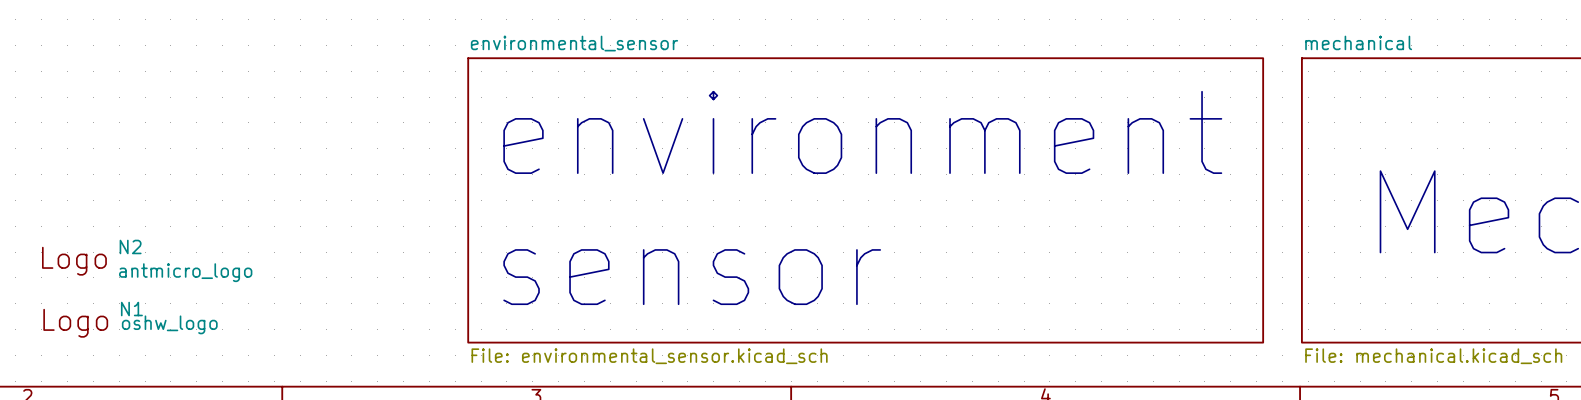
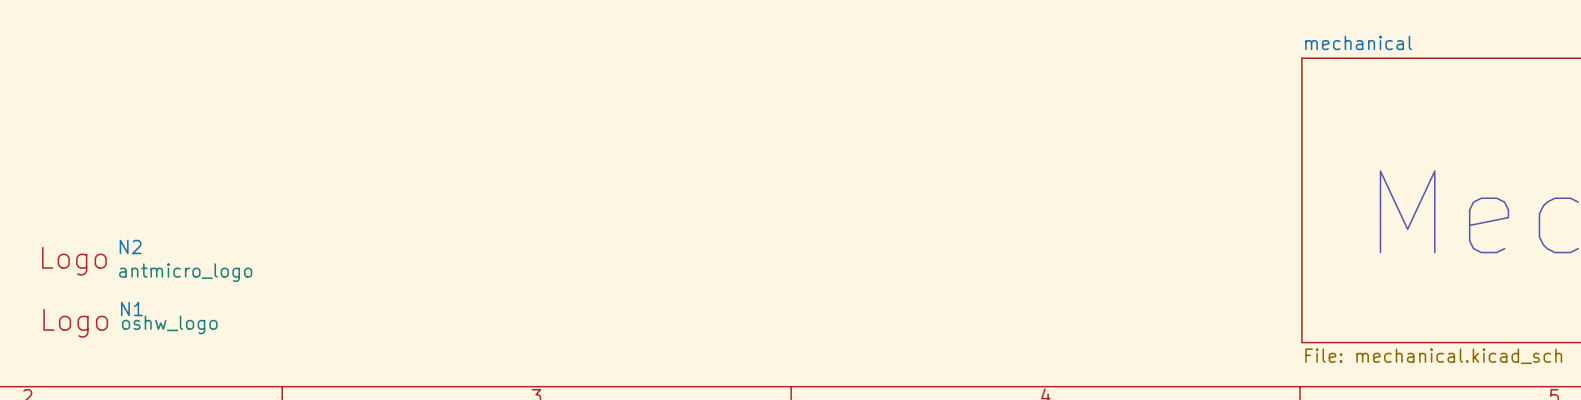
text: environment (862, 132) -> none
sheet environmental_sensor: File: environmental_sensor.kicad_sch (865, 200) -> none
text: sensor (692, 277) -> none

